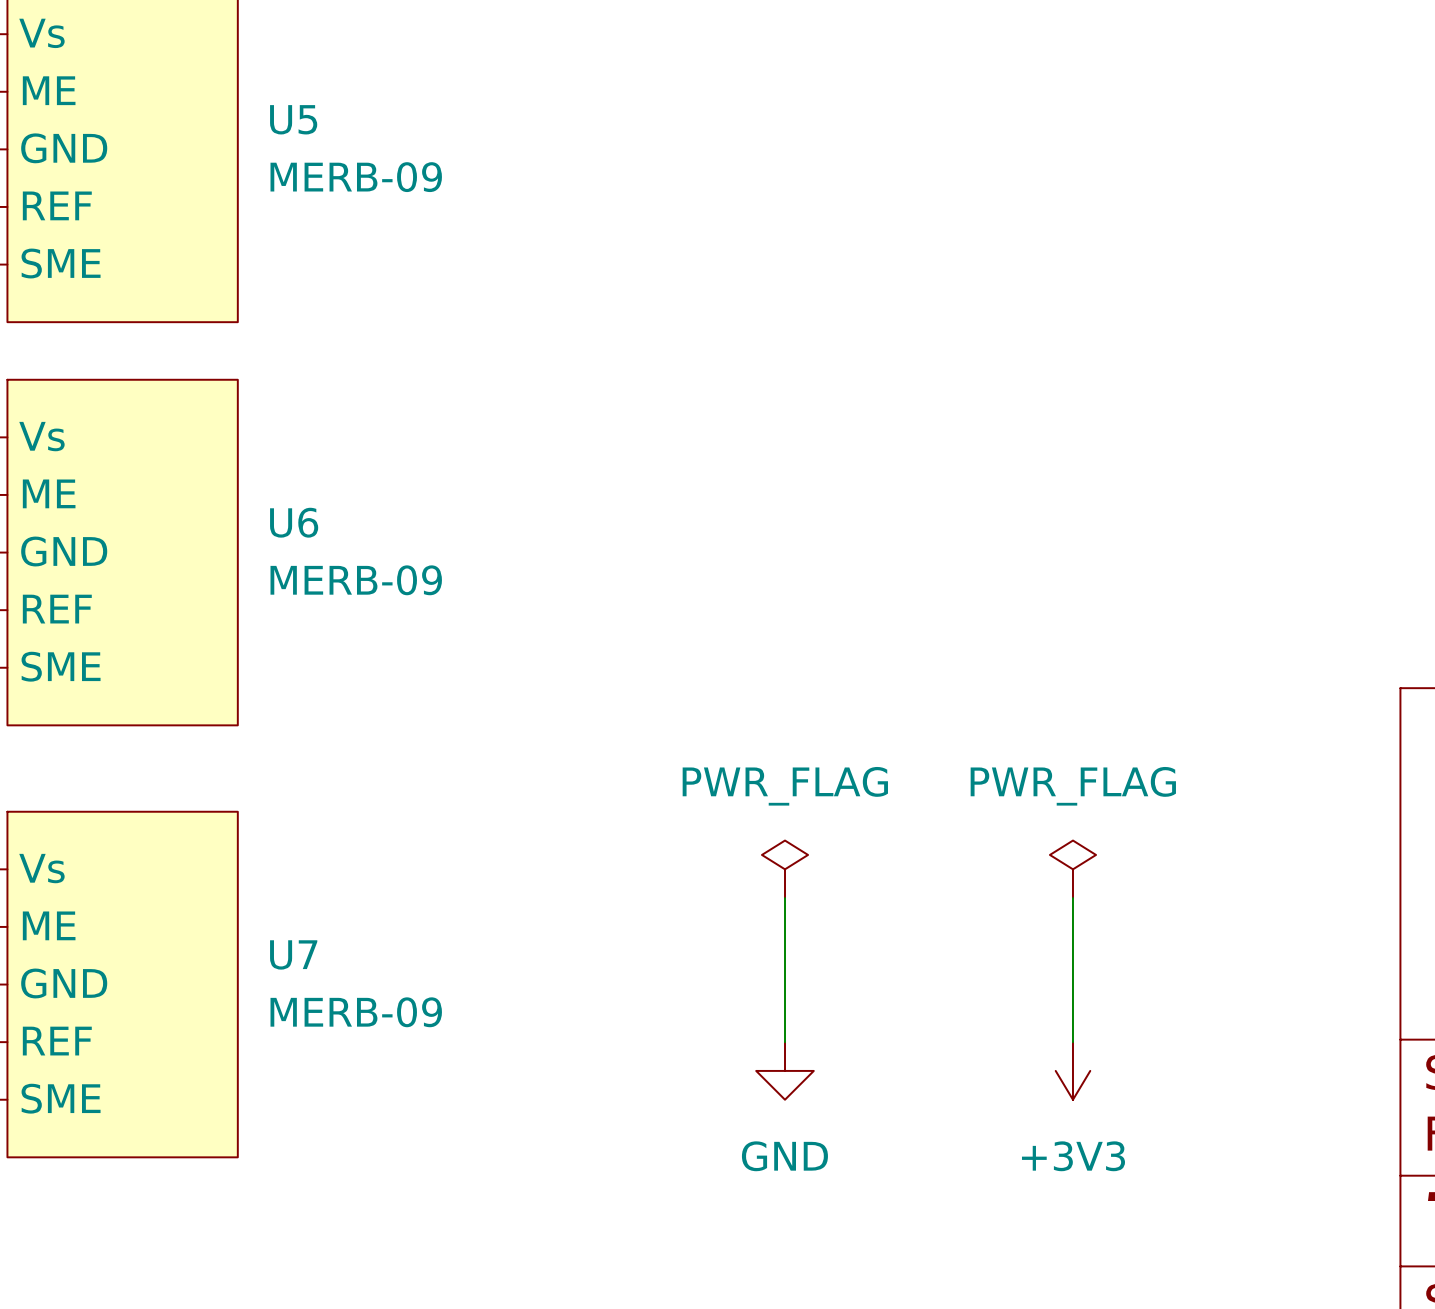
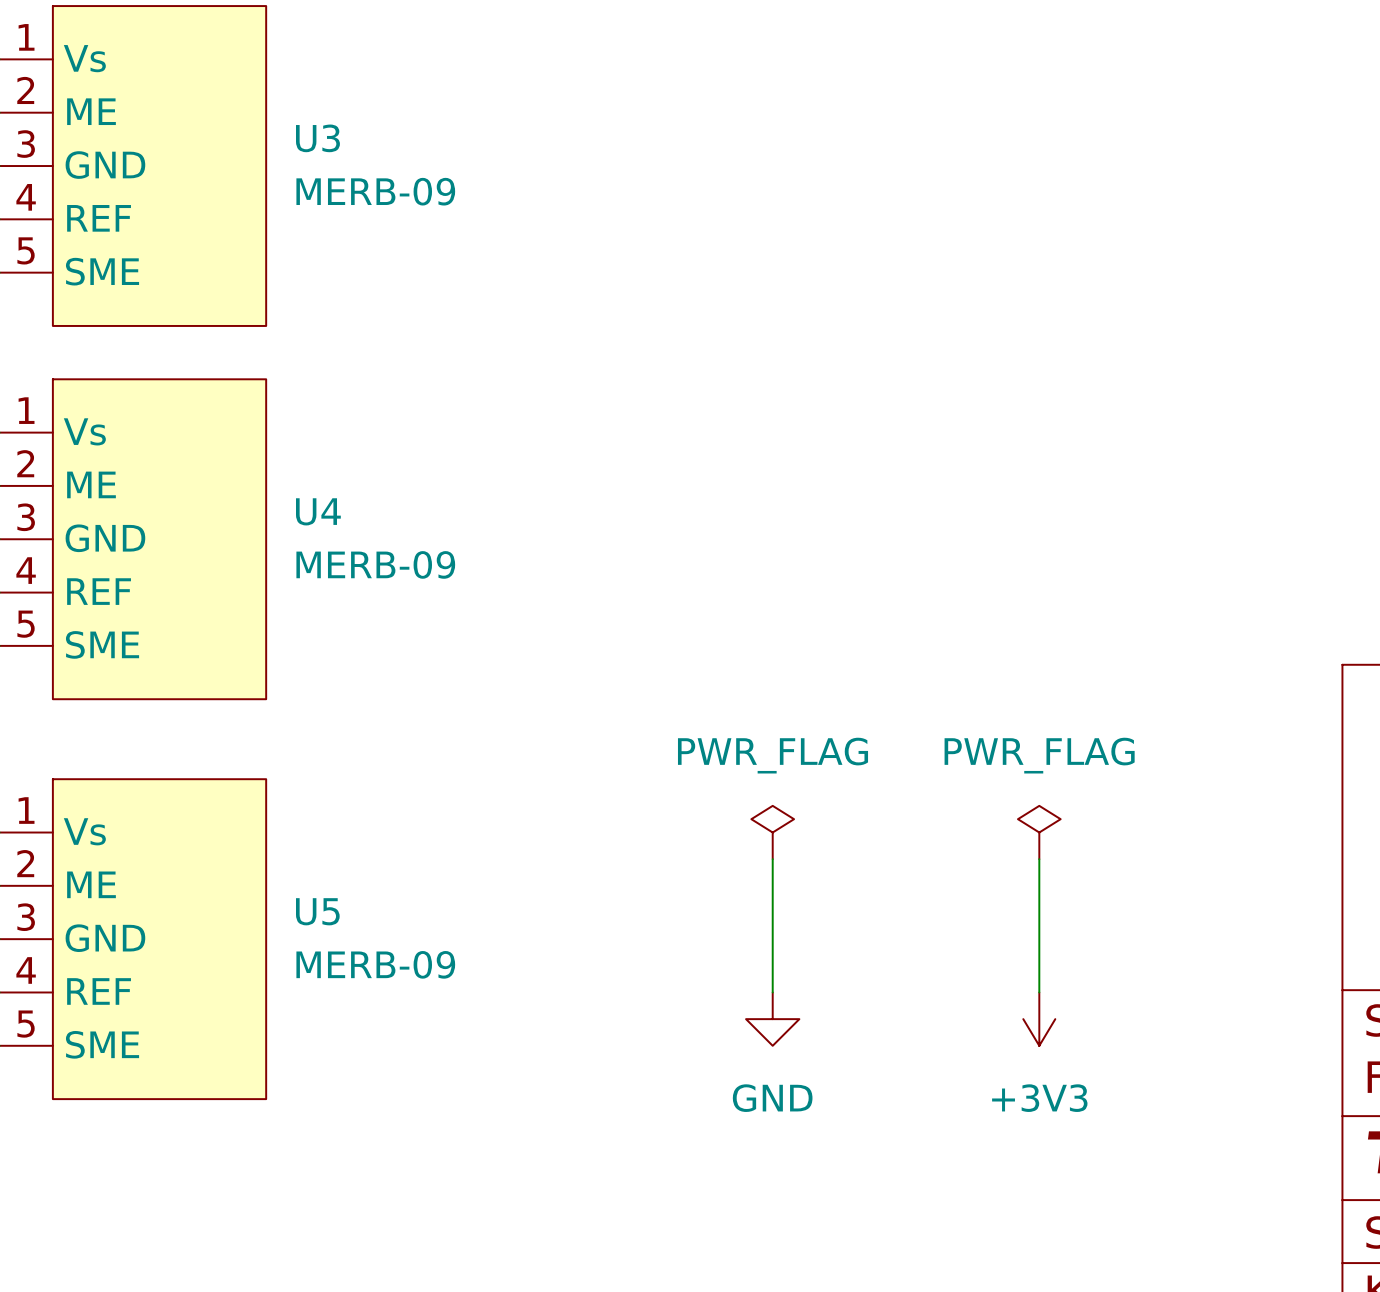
U5 name: U5 (293, 119) -> U3 (317, 138)
U6 name: U6 (294, 522) -> U4 (318, 511)
U7 name: U7 (293, 954) -> U5 (317, 911)

